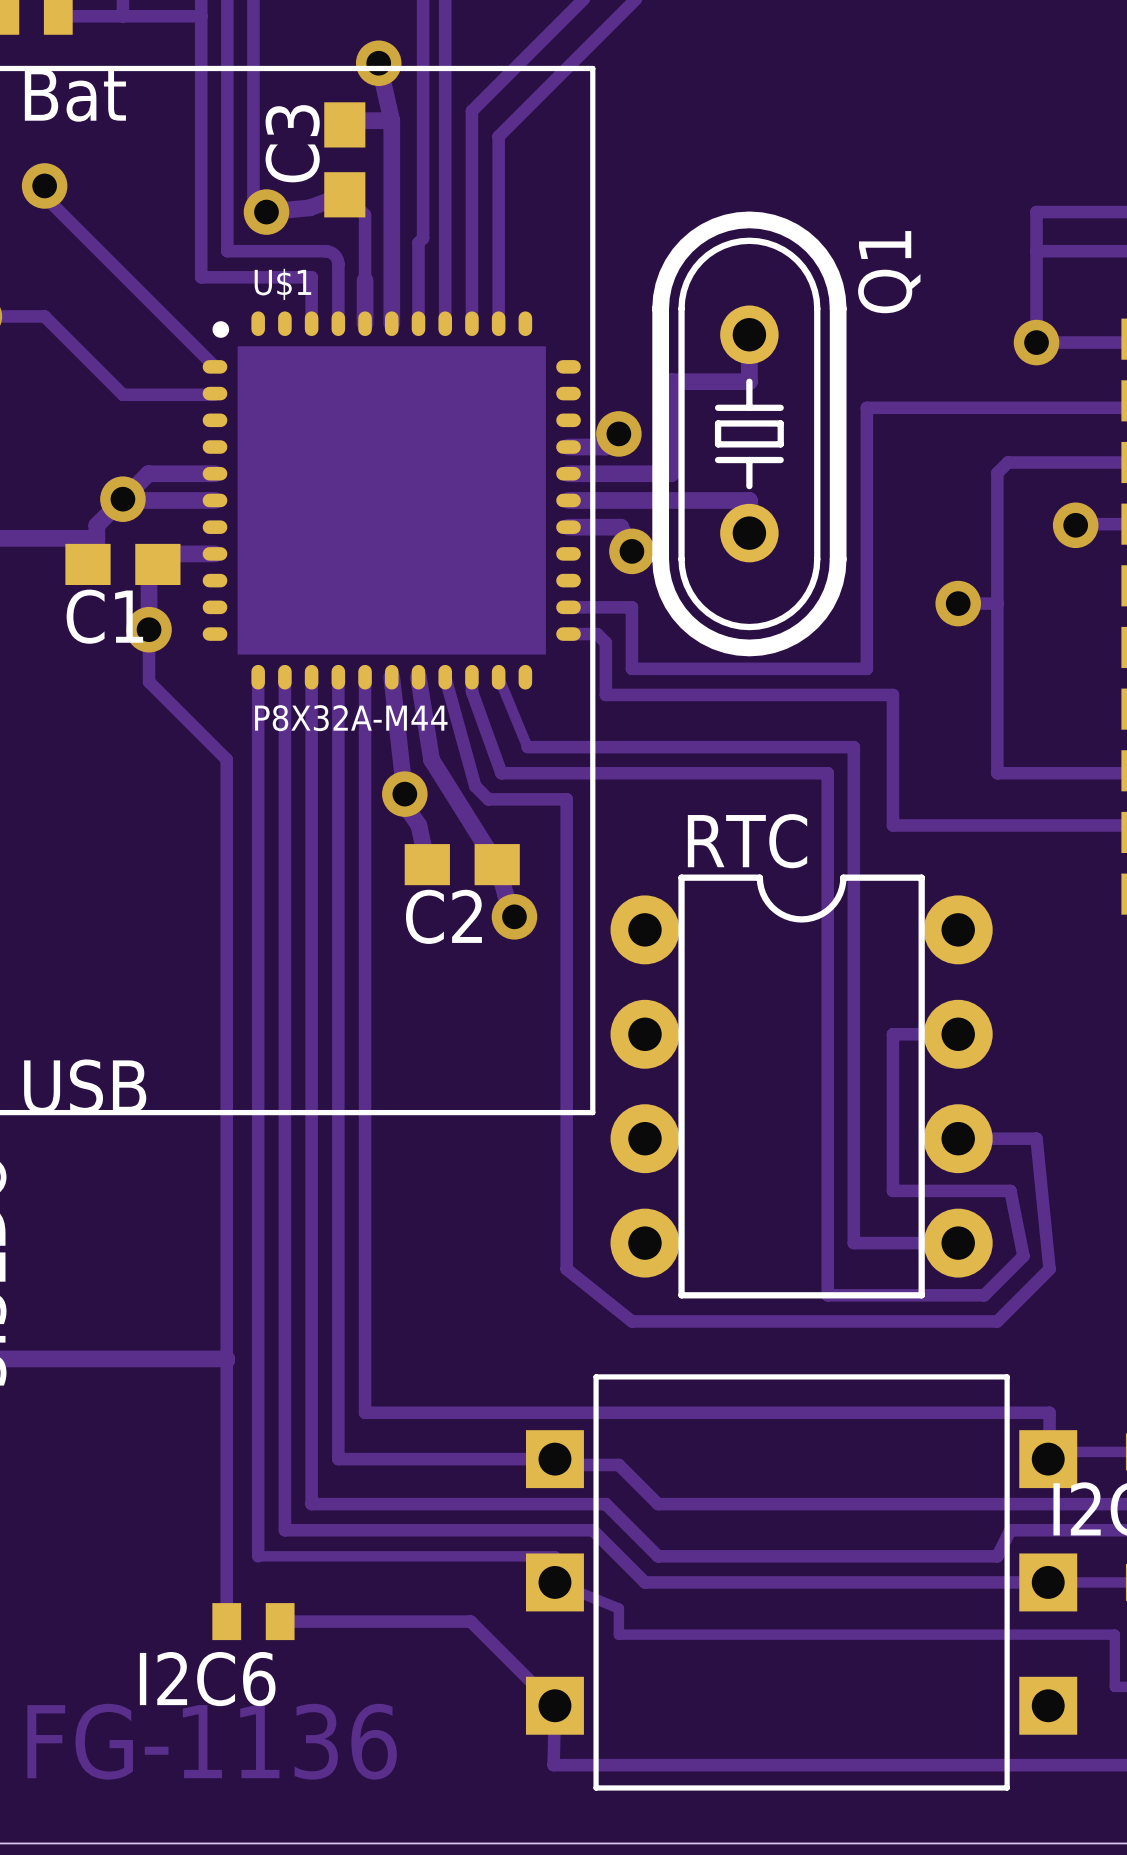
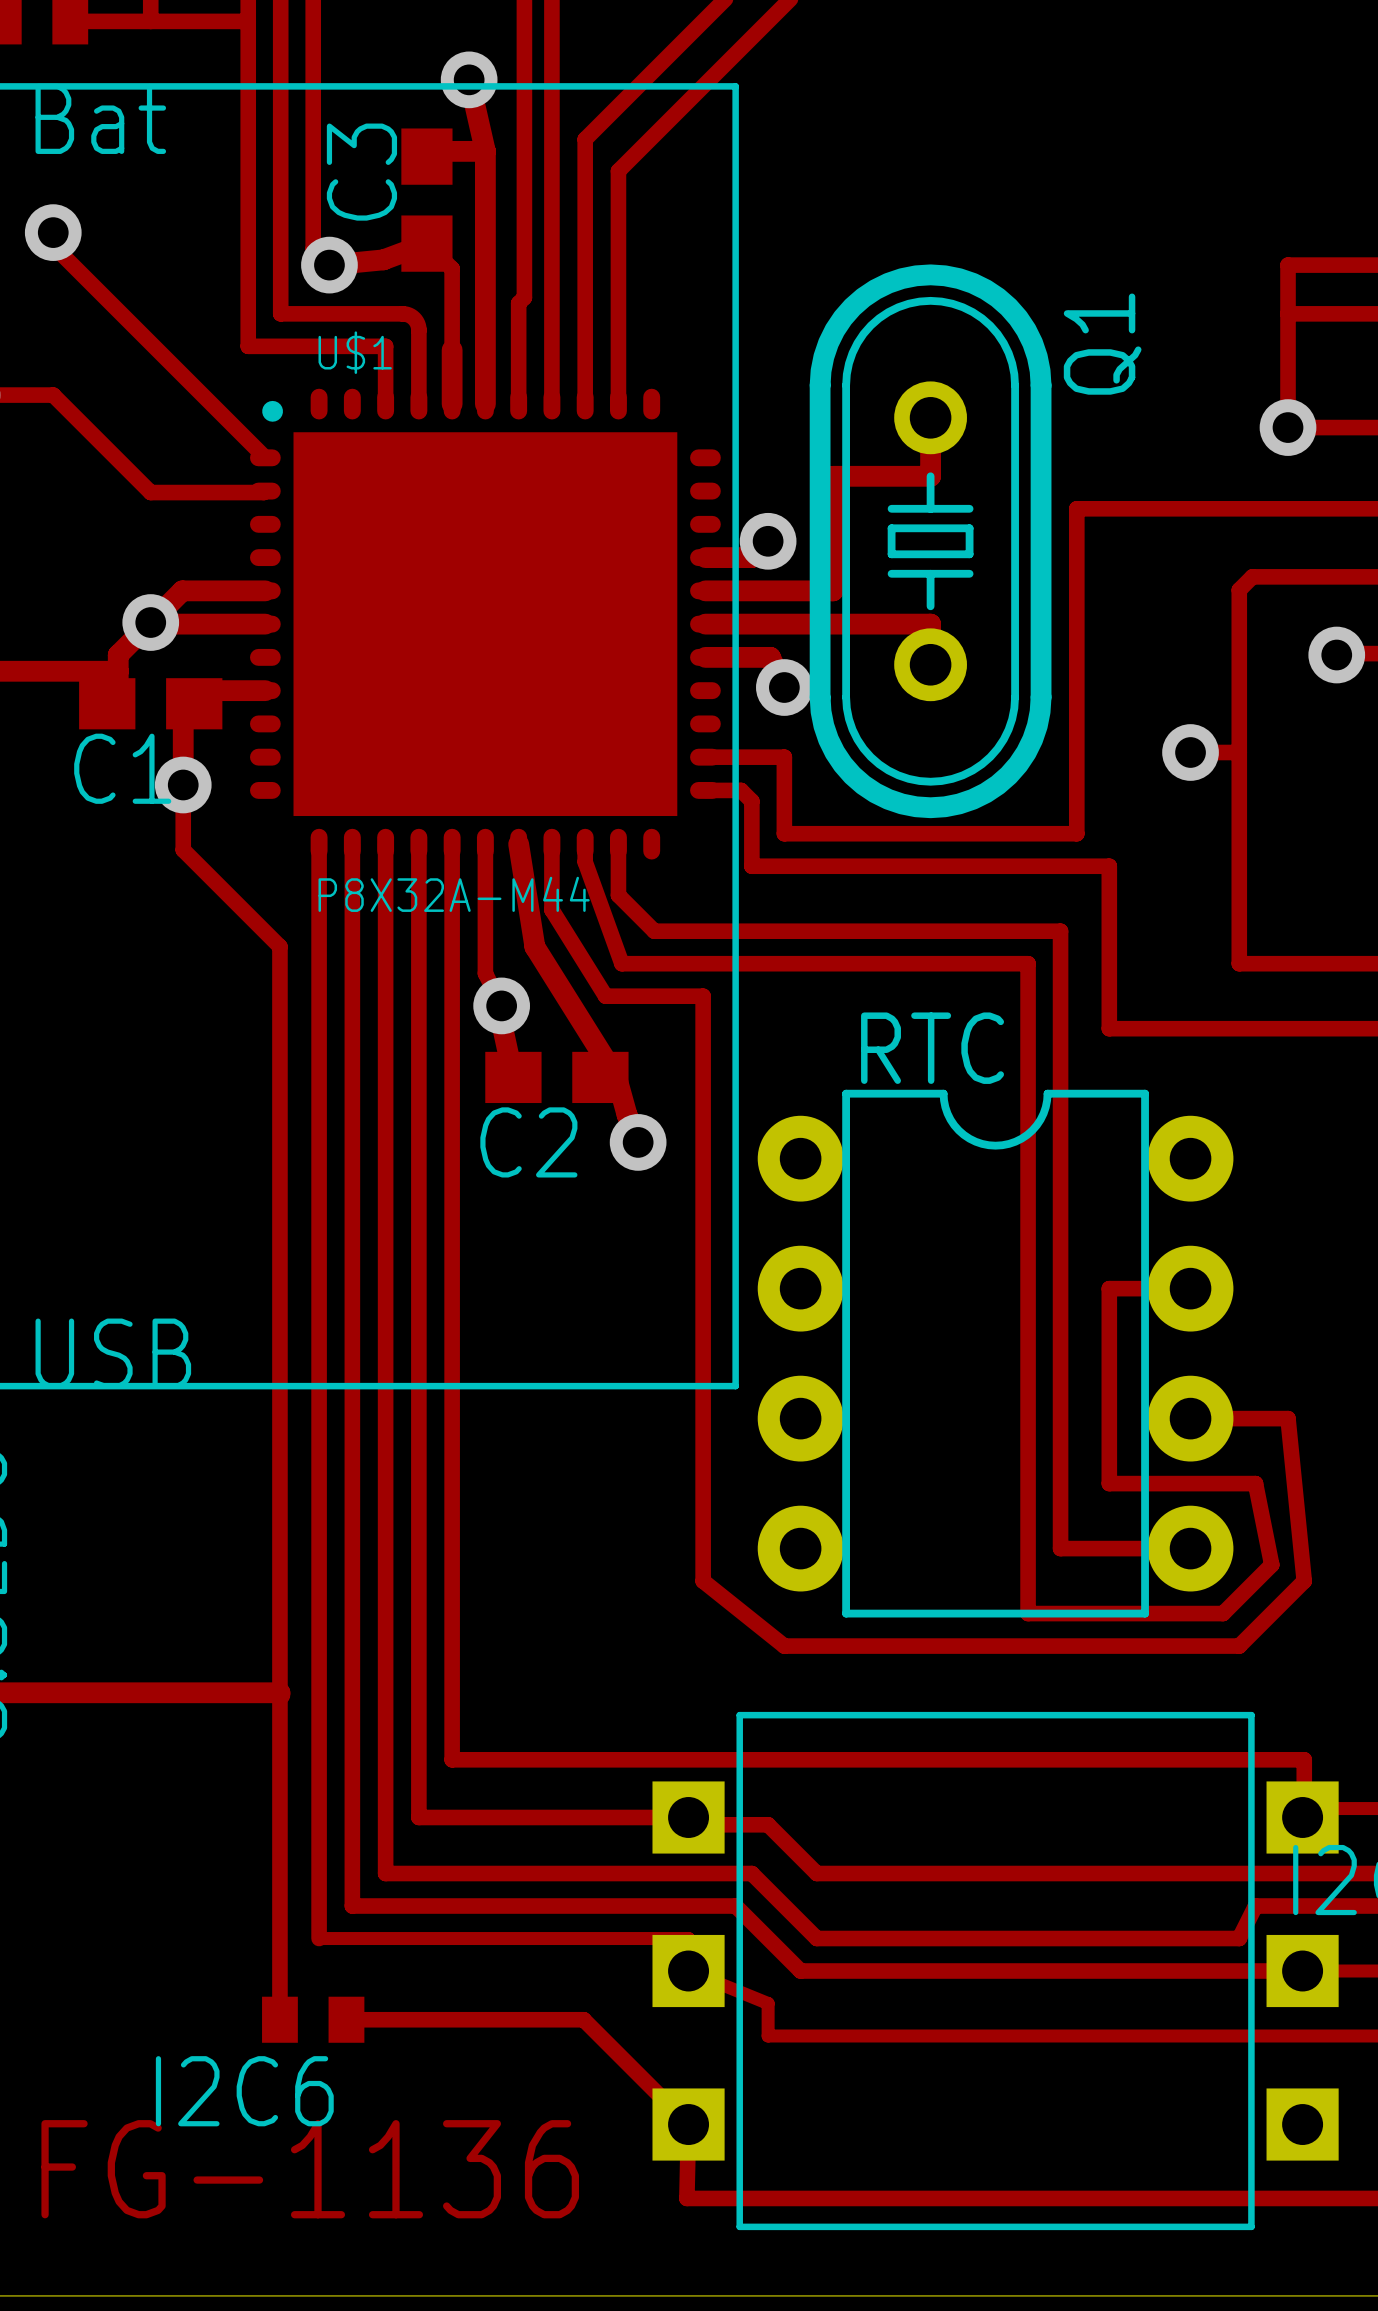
track: (391, 677) (404, 794) (410, 812) (418, 825) (427, 864) -> (485, 844) (485, 973) (501, 1005) (501, 1027) (513, 1077)
track: (445, 677) (475, 786) (488, 799) -> (551, 844) (551, 909) (605, 996)
track: (498, 677) (527, 747) -> (618, 844) (618, 895) (654, 931)
via position: (404, 794) -> (501, 1005)
C2 position: (462, 864) -> (556, 1077)

